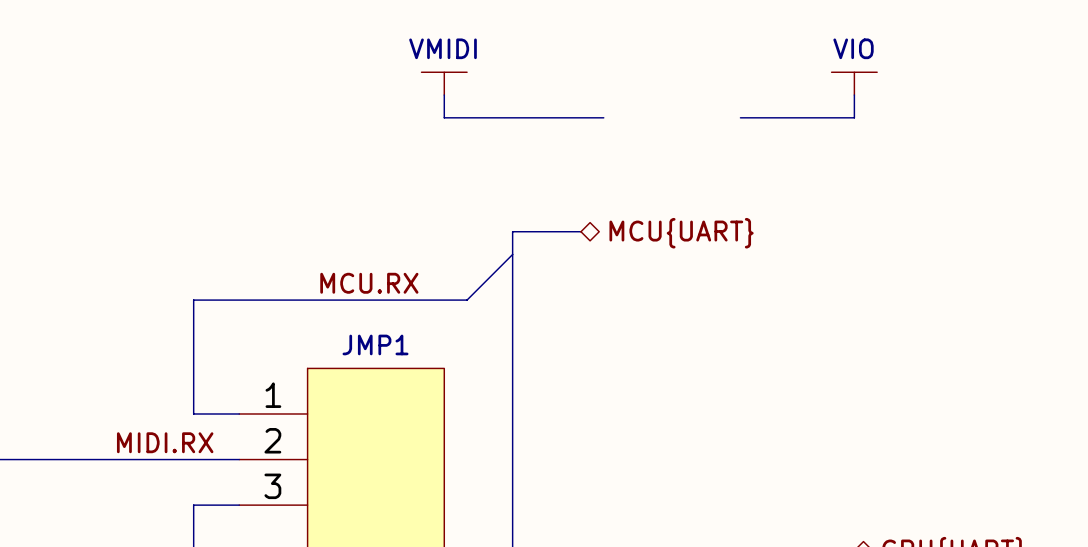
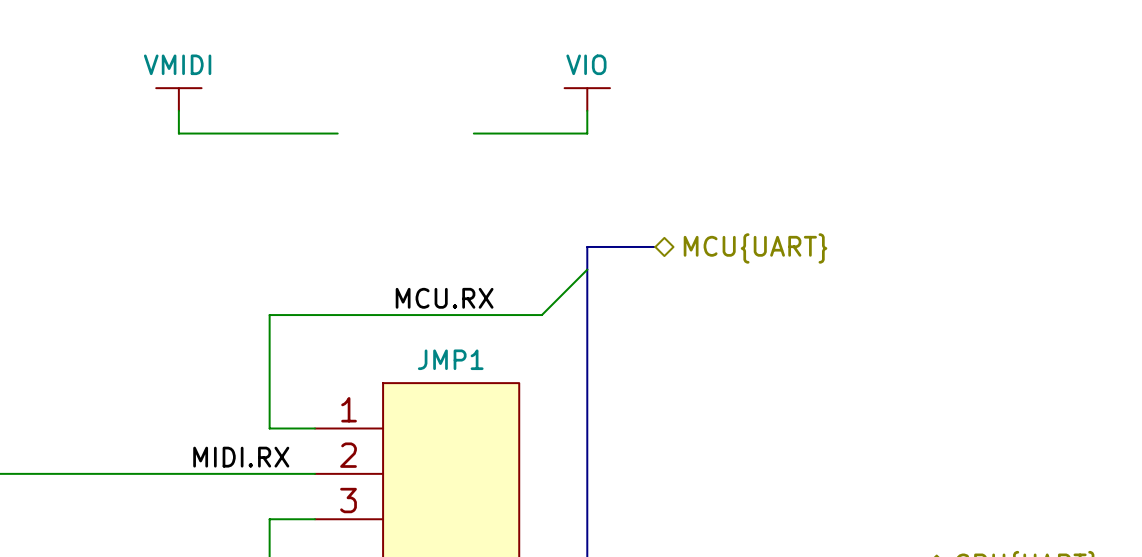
power symbol position: VMIDI (444, 83) -> VMIDI (178, 99)
power symbol position: VIO (854, 83) -> VIO (587, 99)
wire: none -> (178, 110) (178, 133) (337, 133)
wire: (444, 95) (444, 117) -> (473, 133) (519, 133)
wire: (854, 95) (854, 117) (740, 117) -> none
wire: (512, 117) (603, 117) -> (587, 133) (587, 110)

